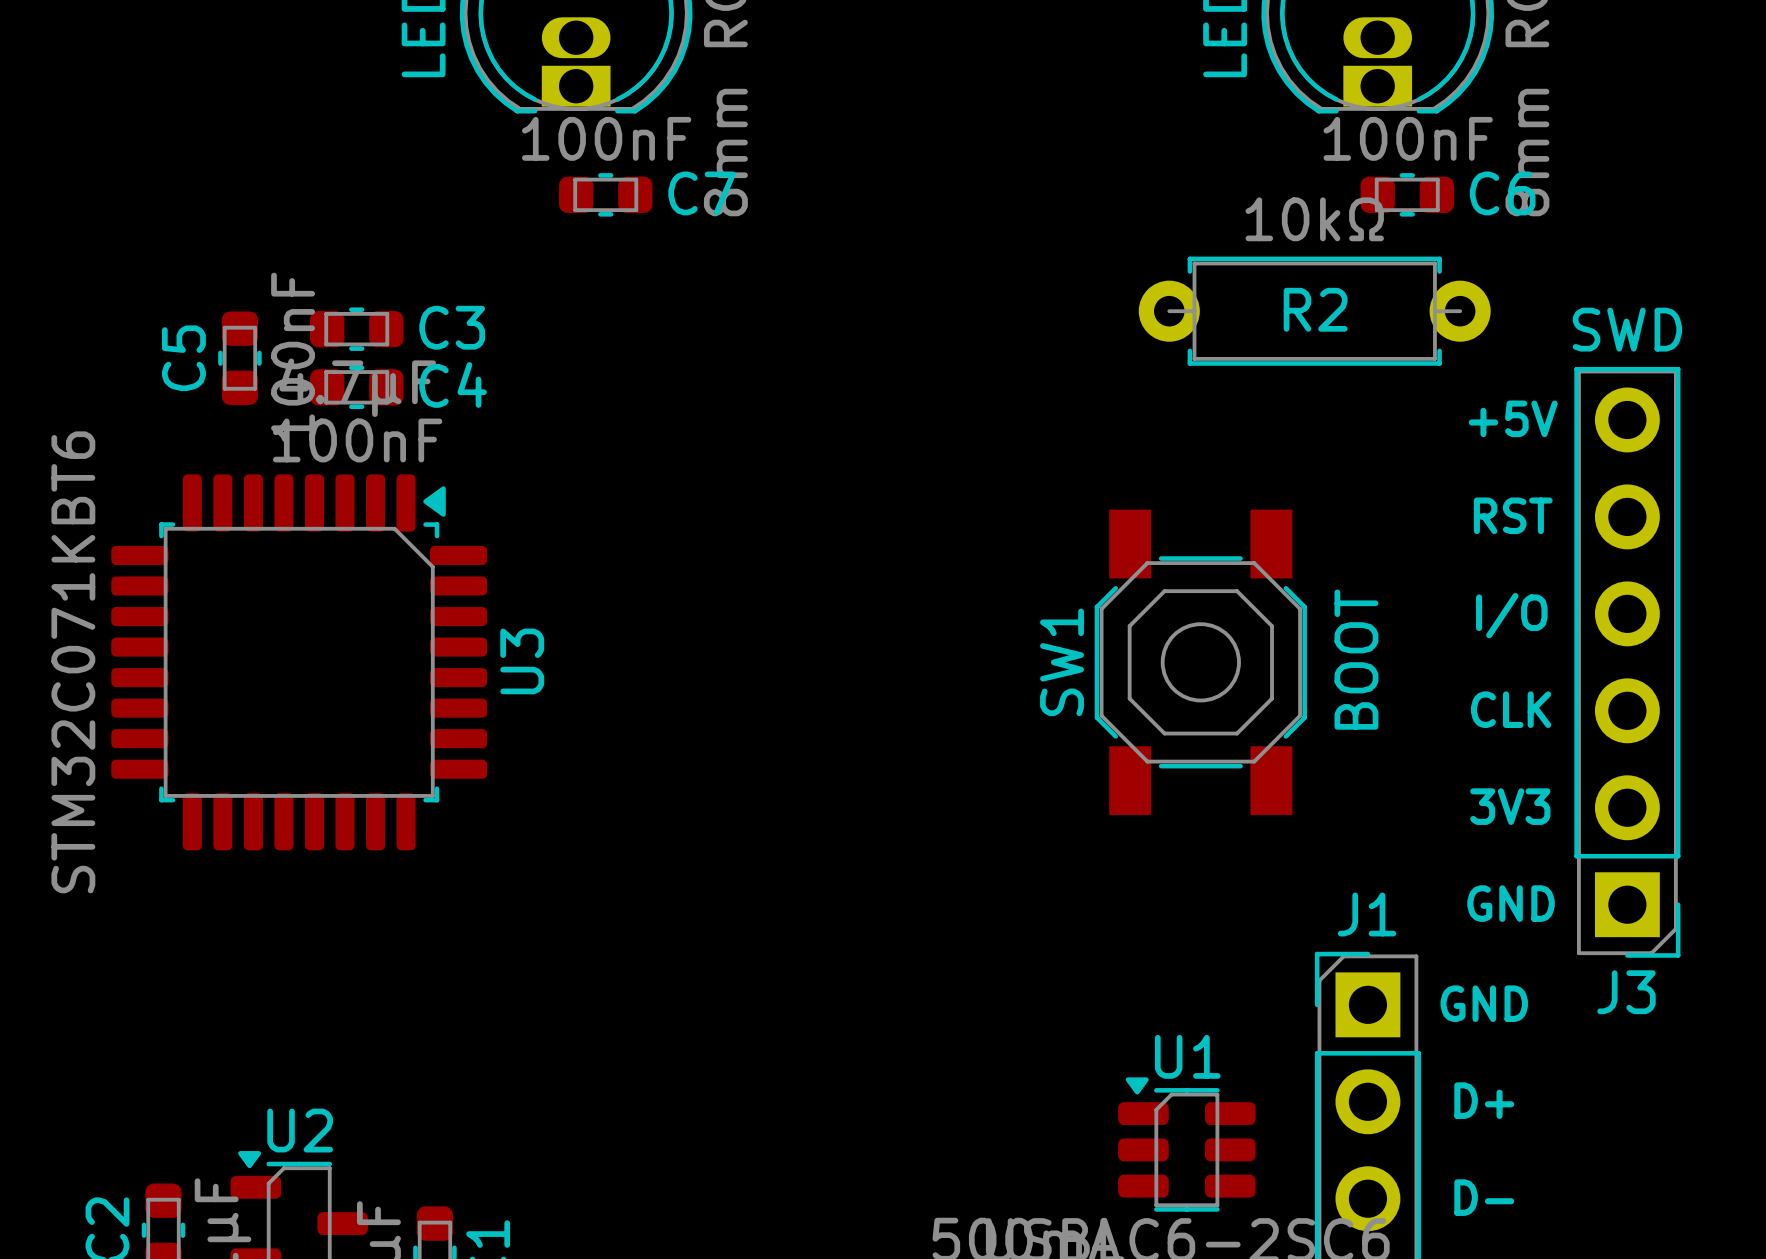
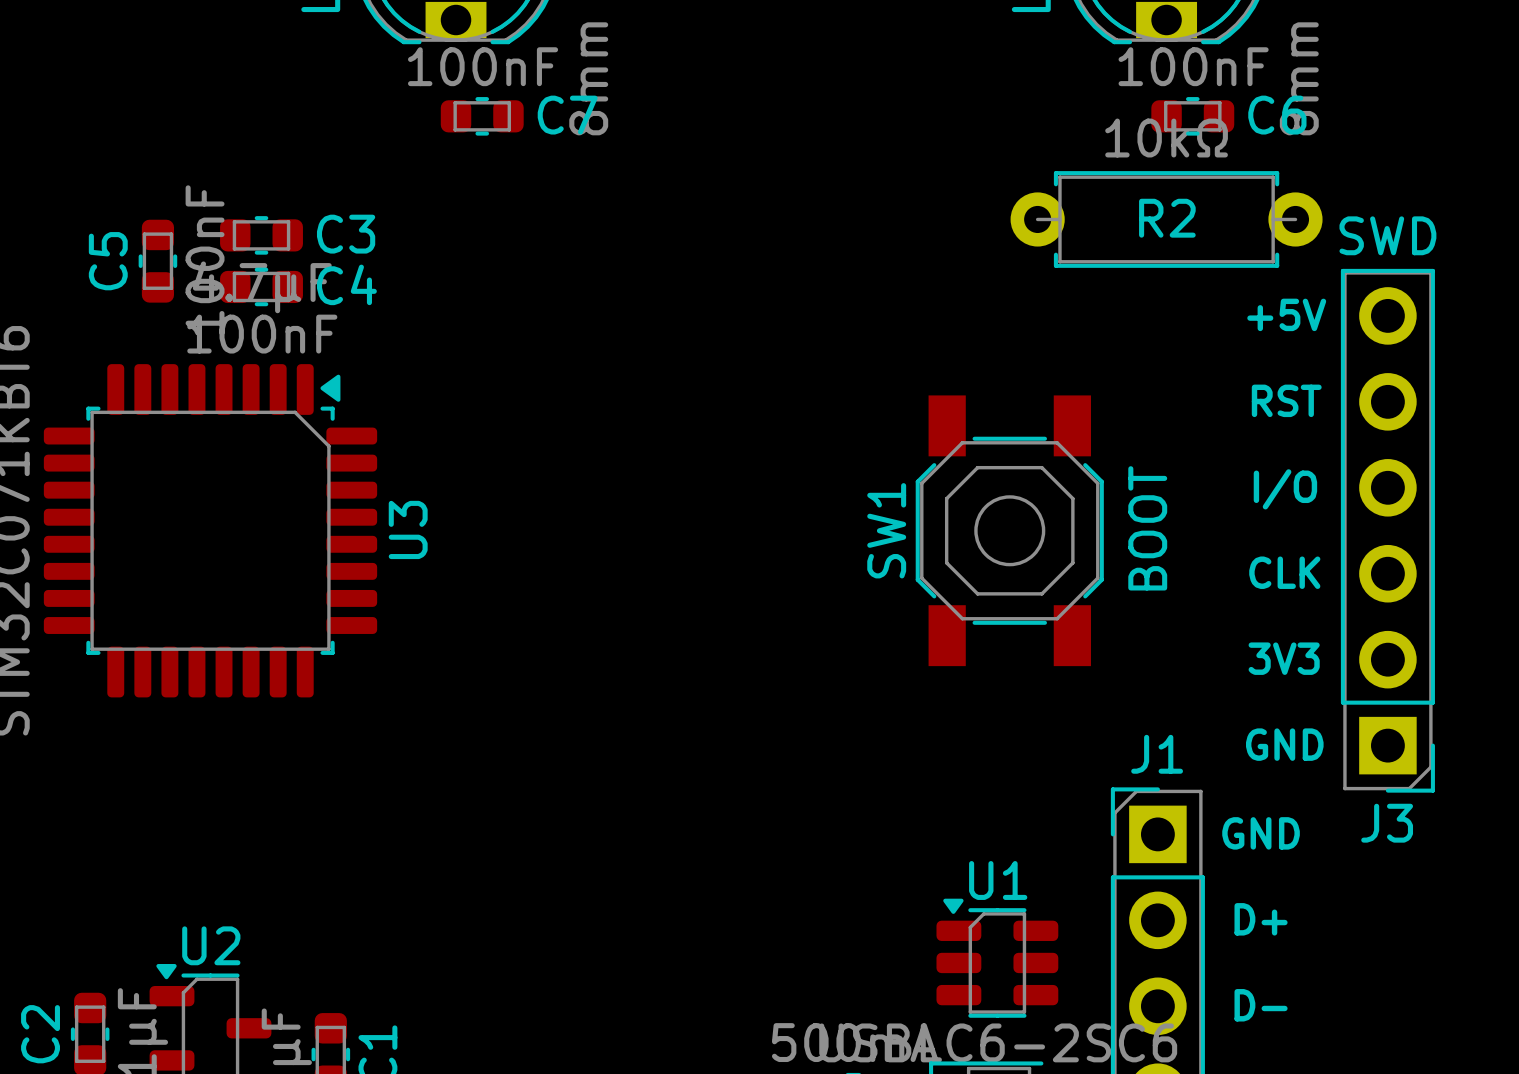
R2 position: (1314, 311) -> (1166, 219)

